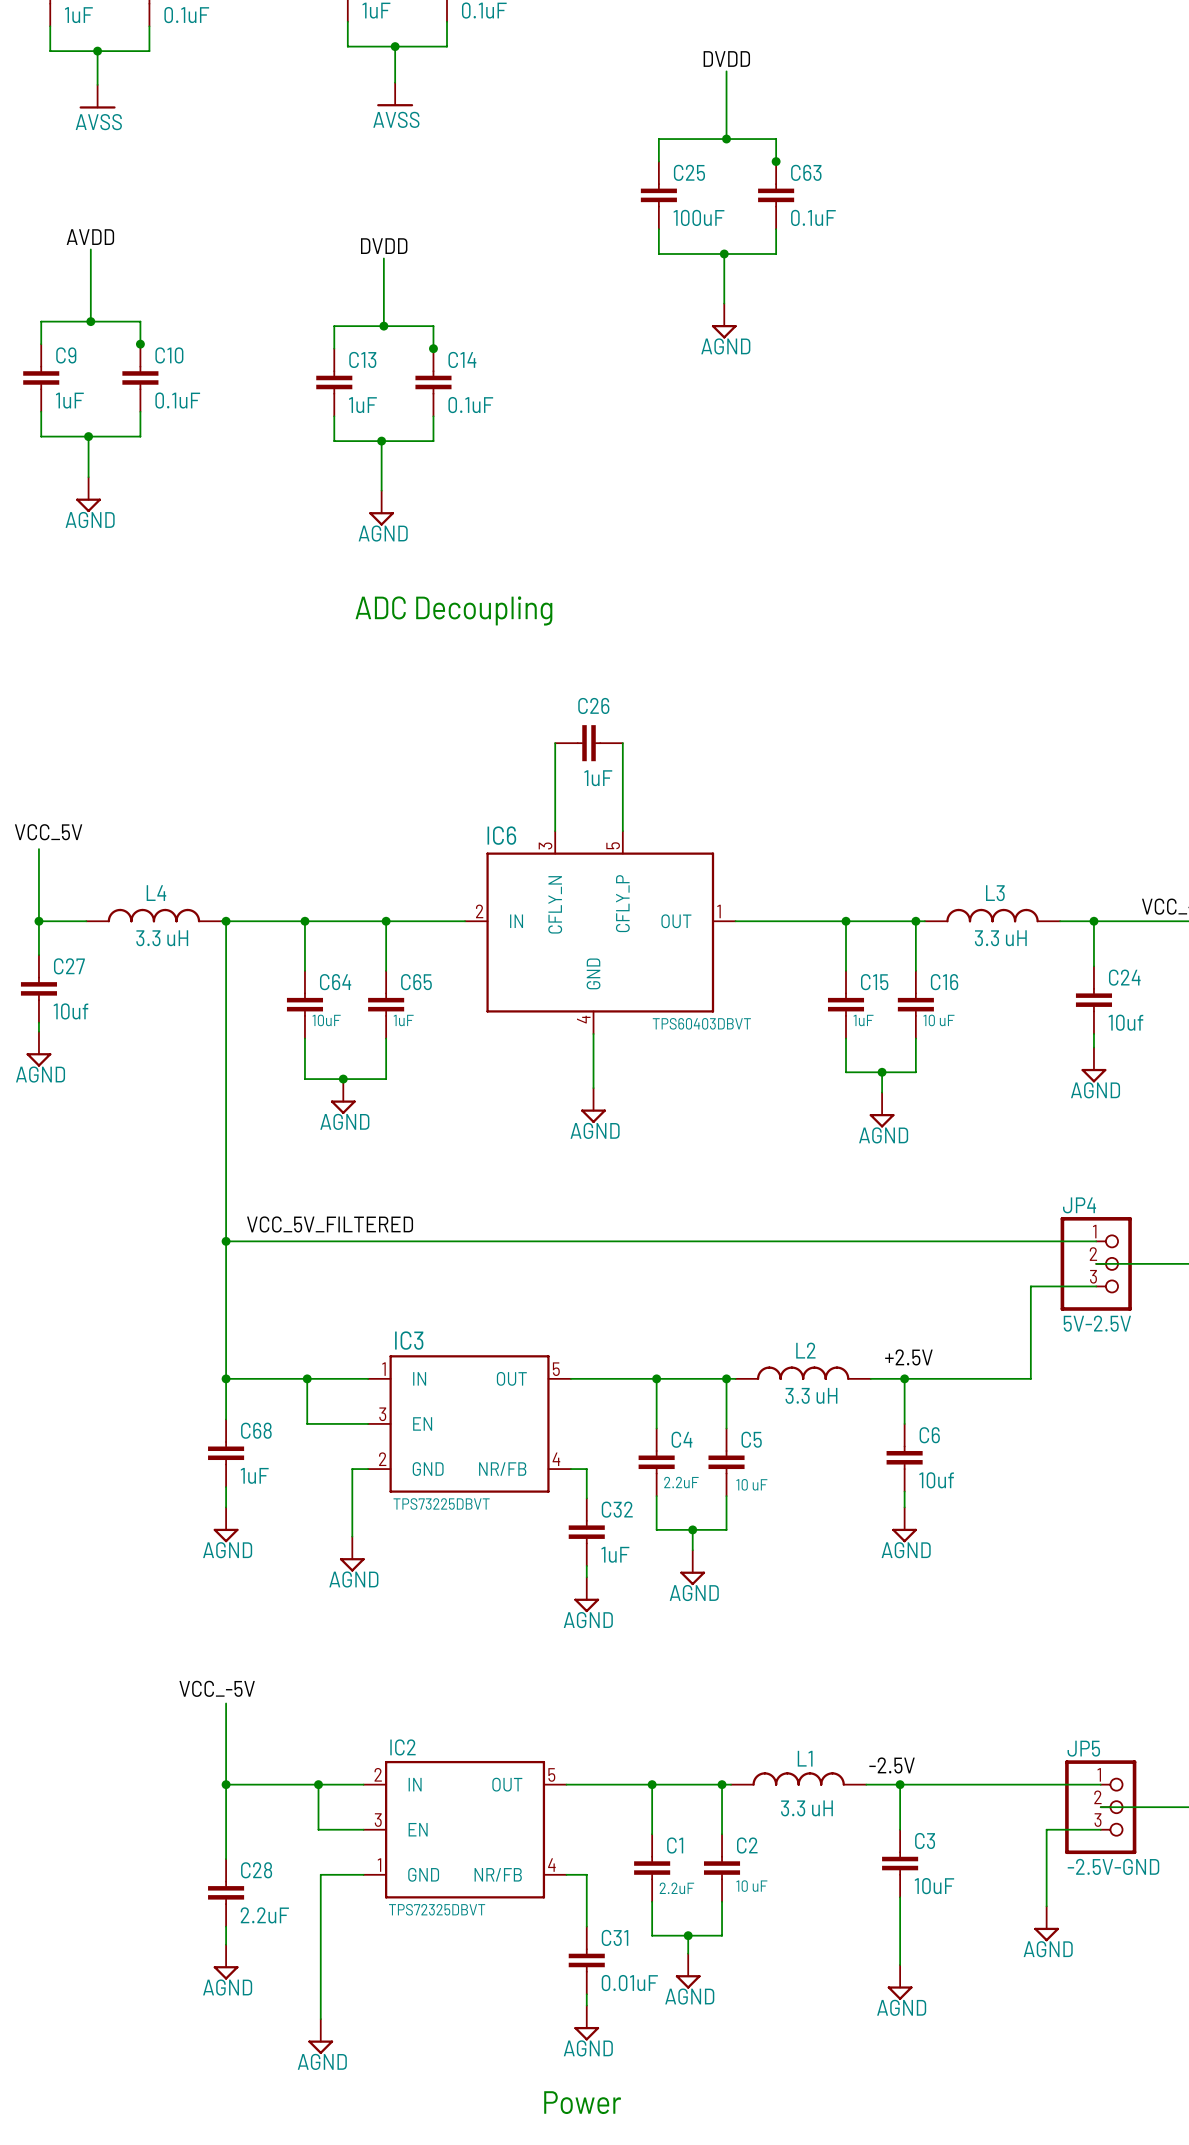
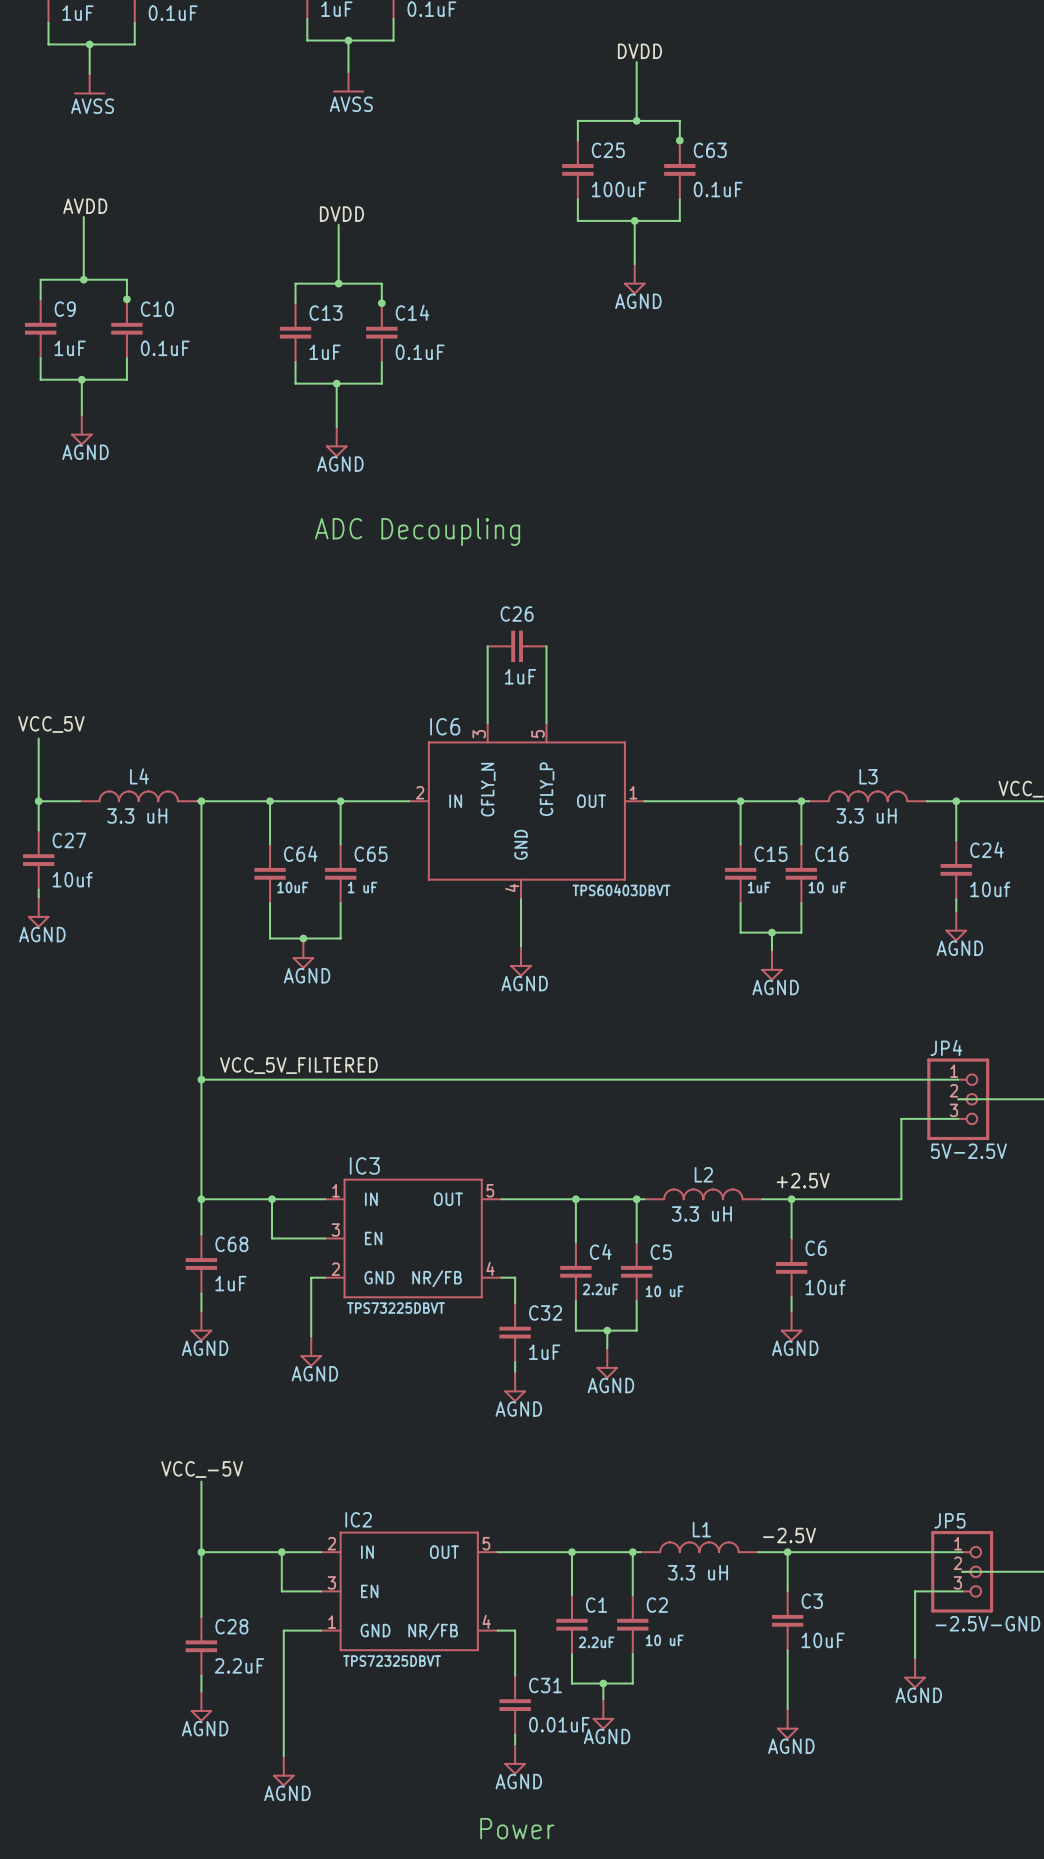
C65 value: 1uF (403, 1020) -> 1 uF (362, 887)

